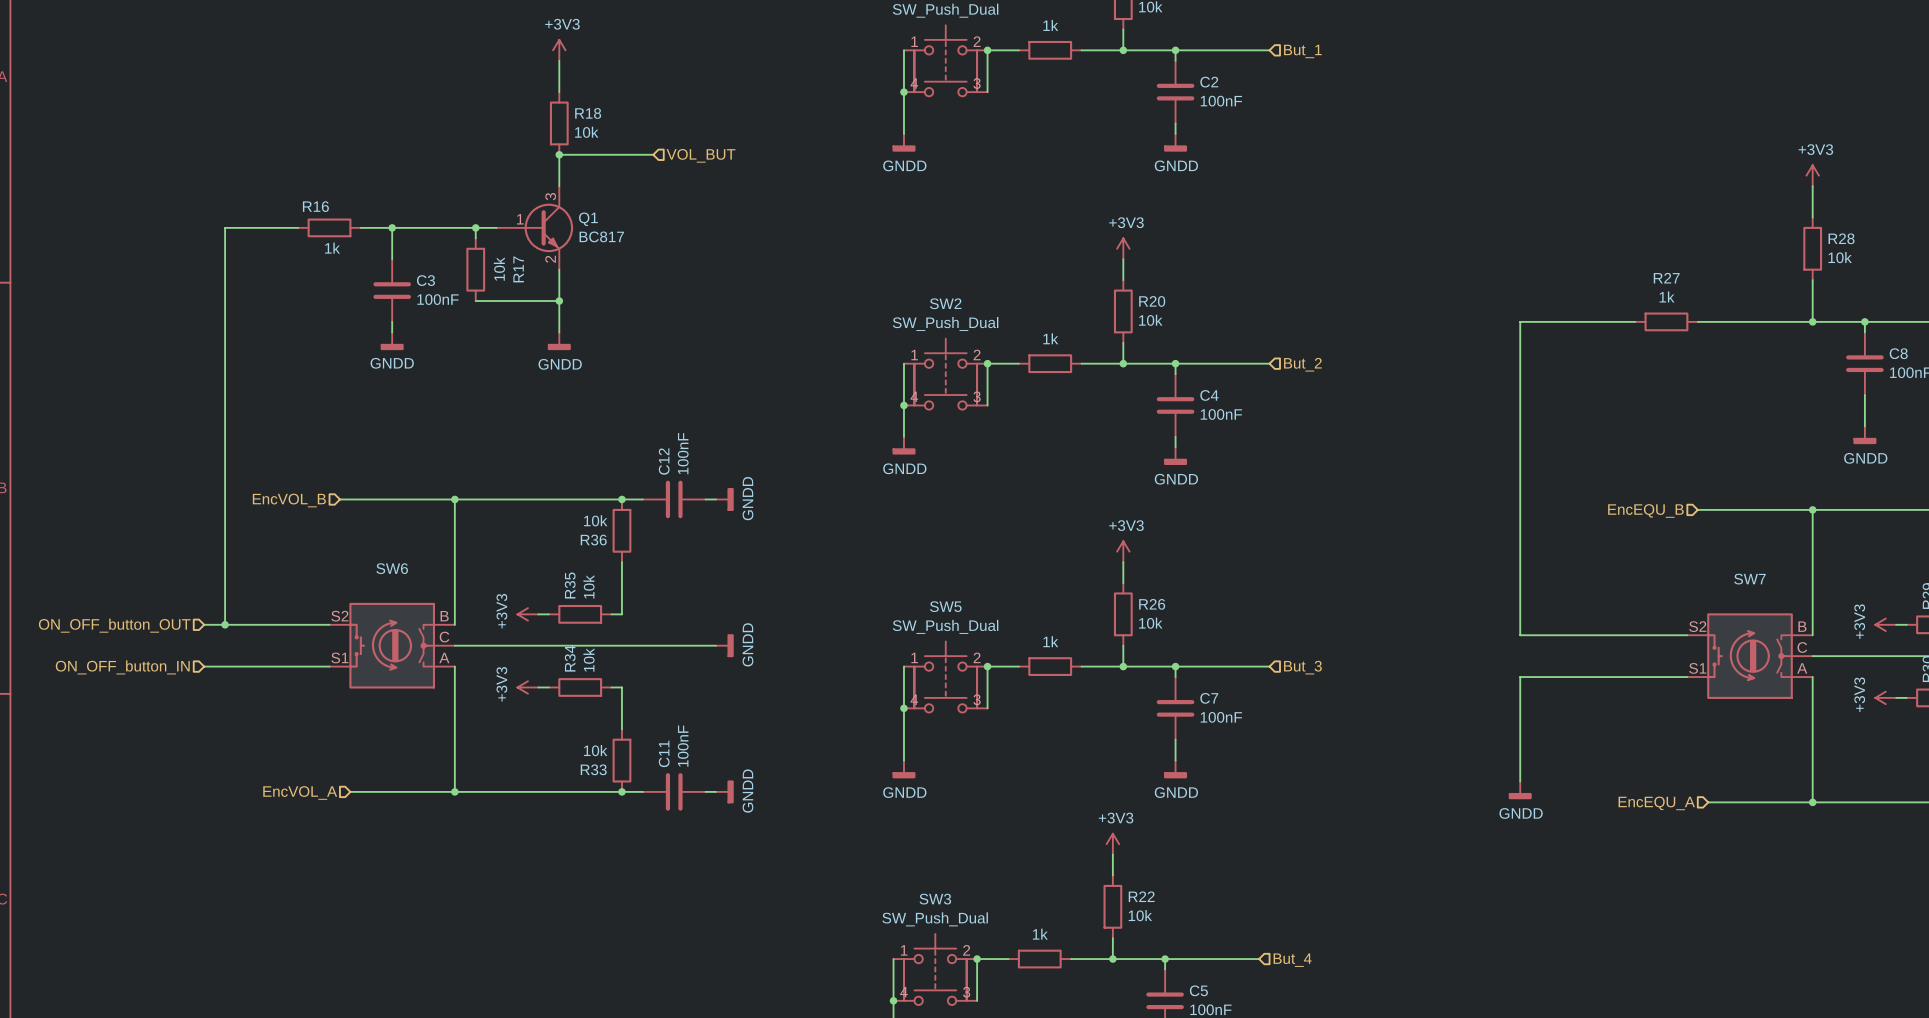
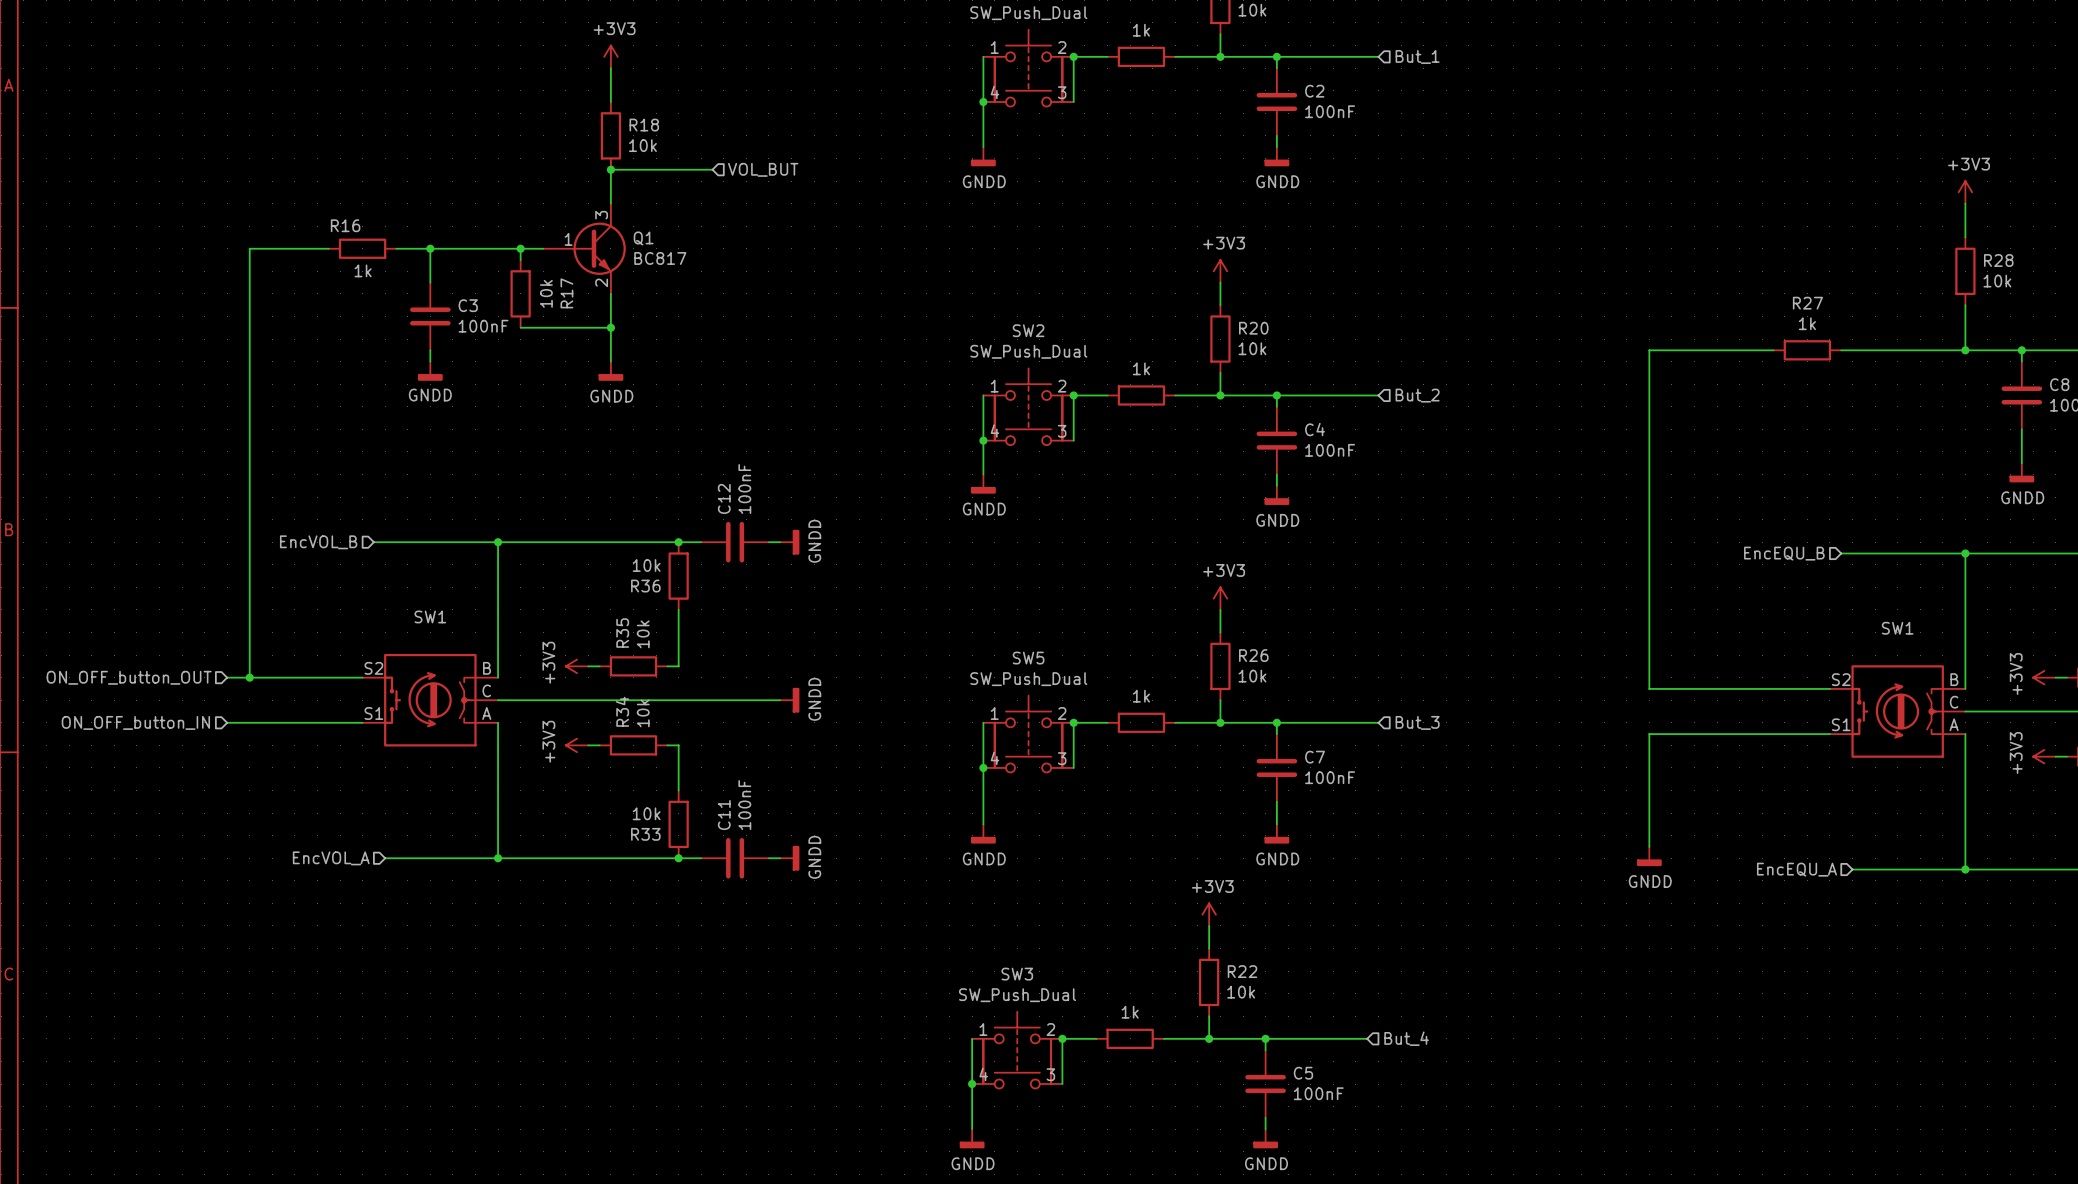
SW6 name: SW6 (392, 568) -> SW1 (430, 616)
SW7 name: SW7 (1749, 579) -> SW1 (1897, 628)

